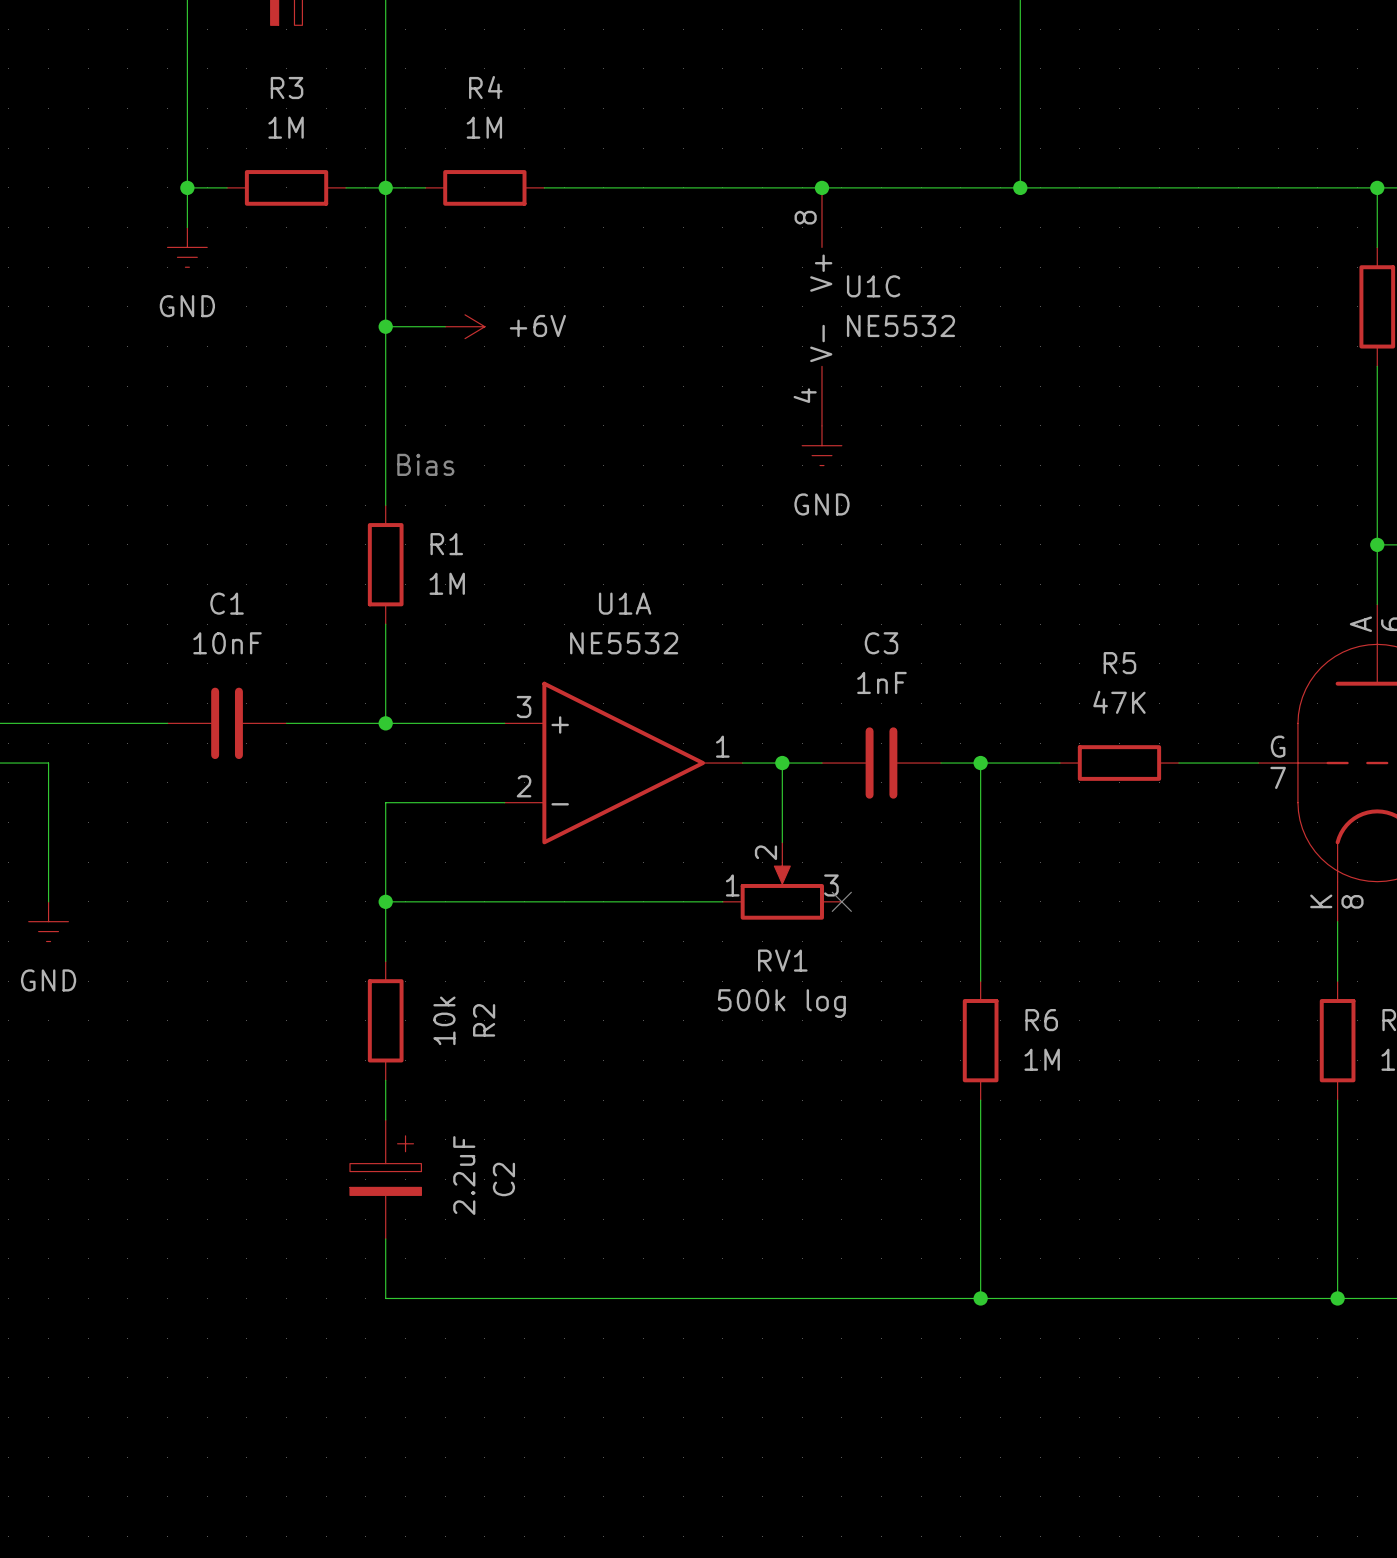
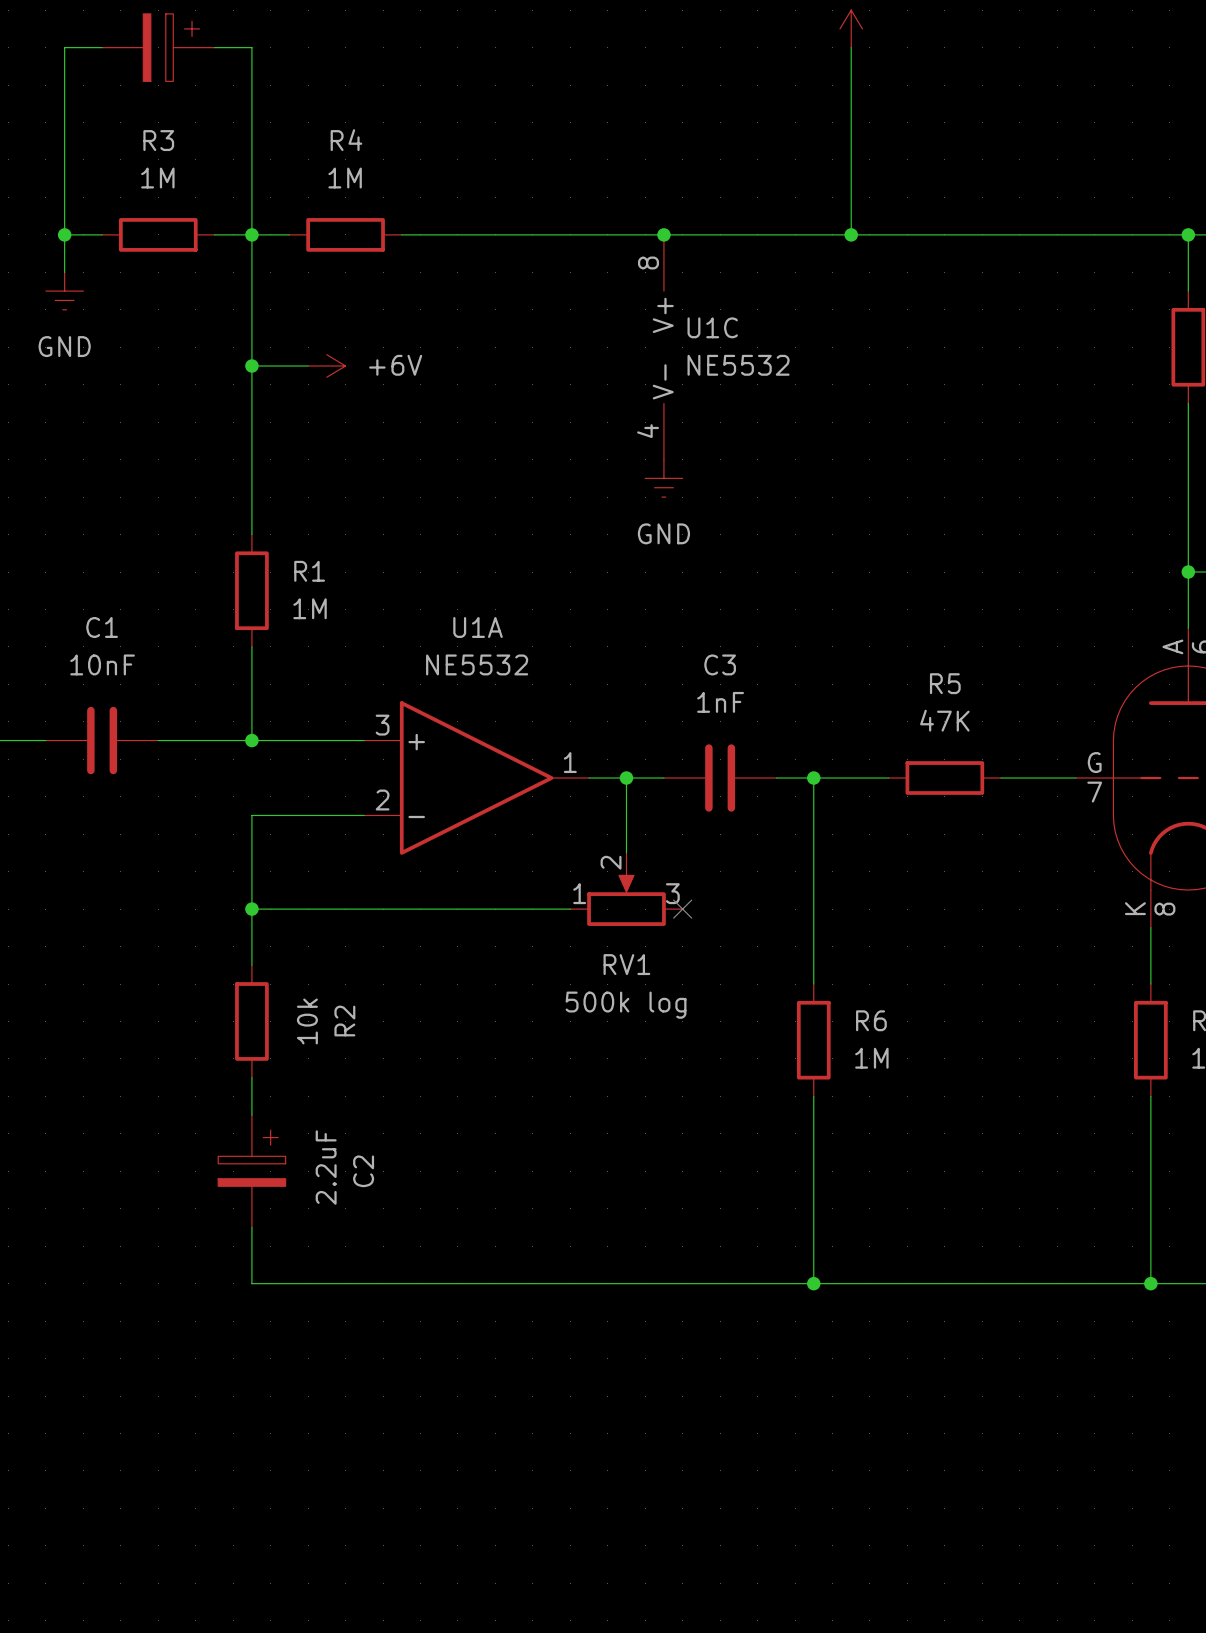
text: Bias (425, 464) -> none

